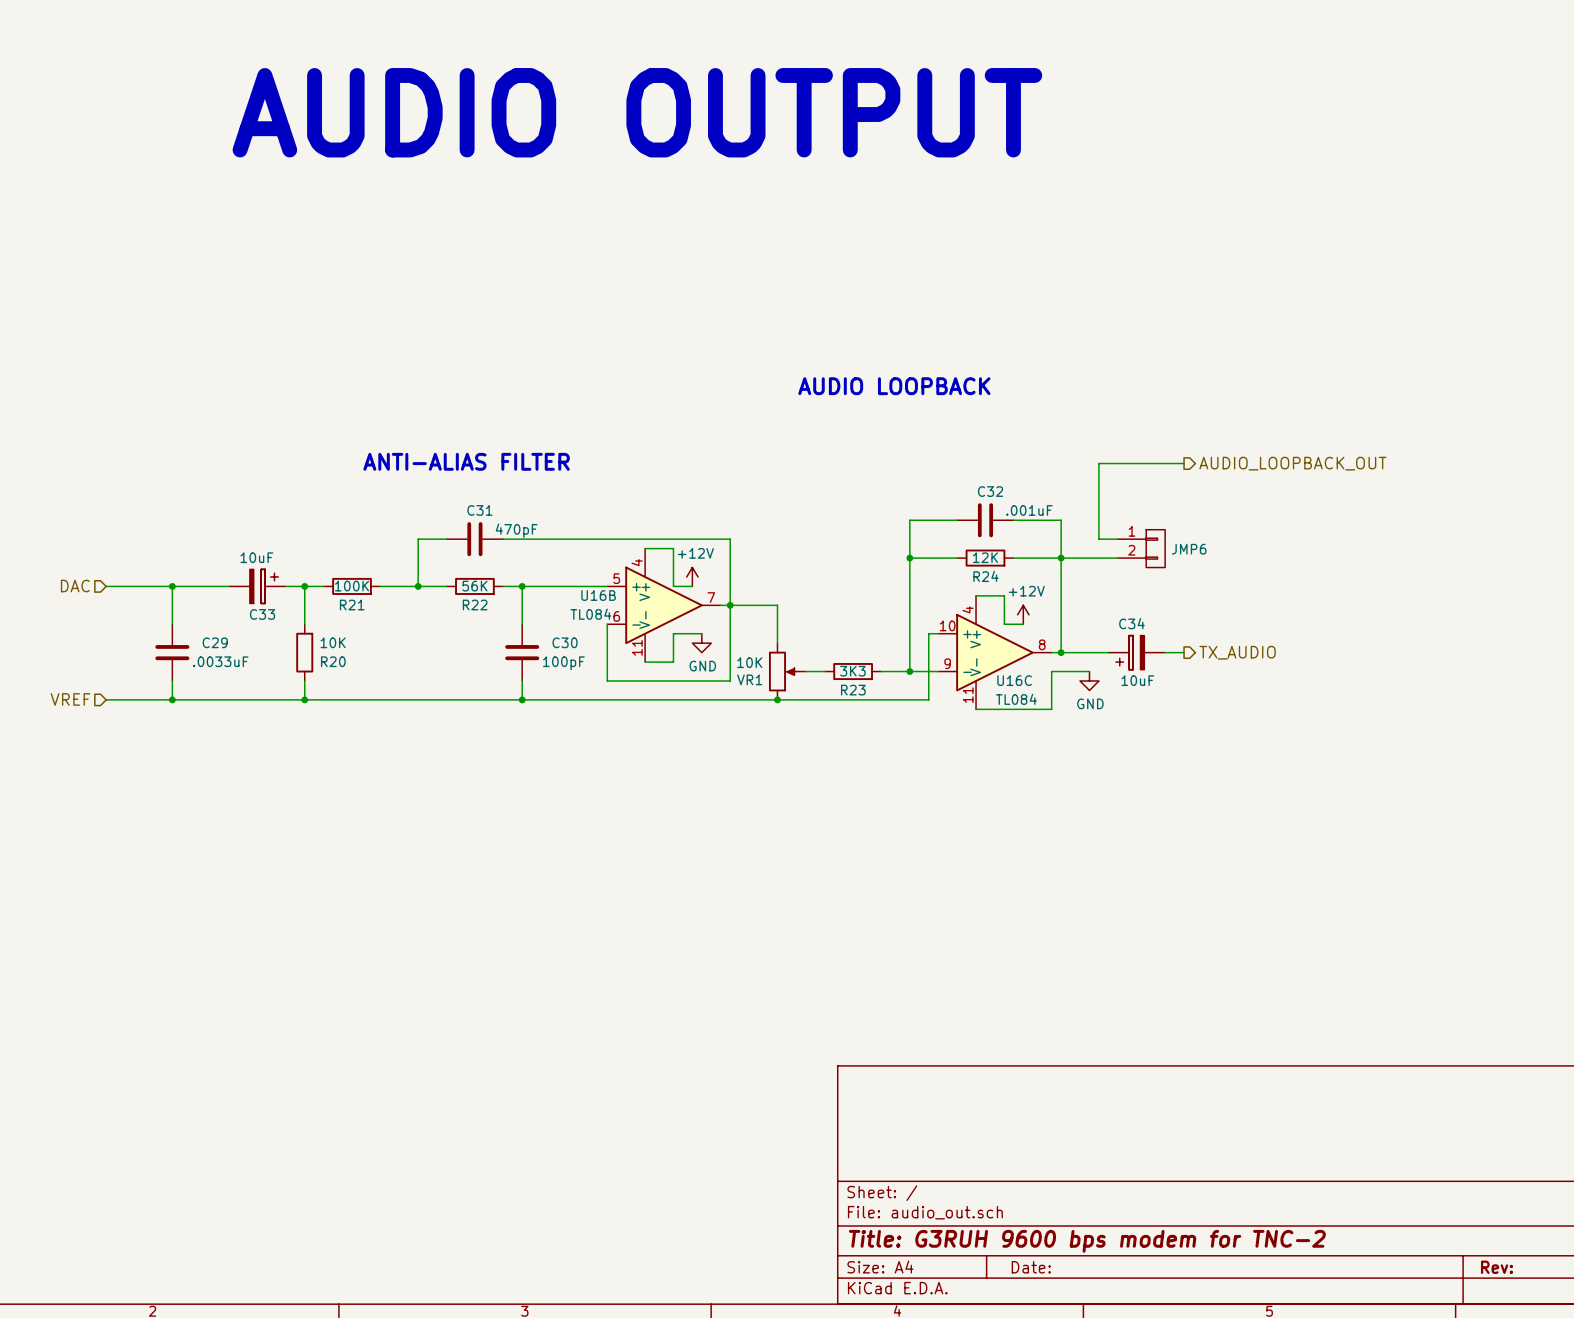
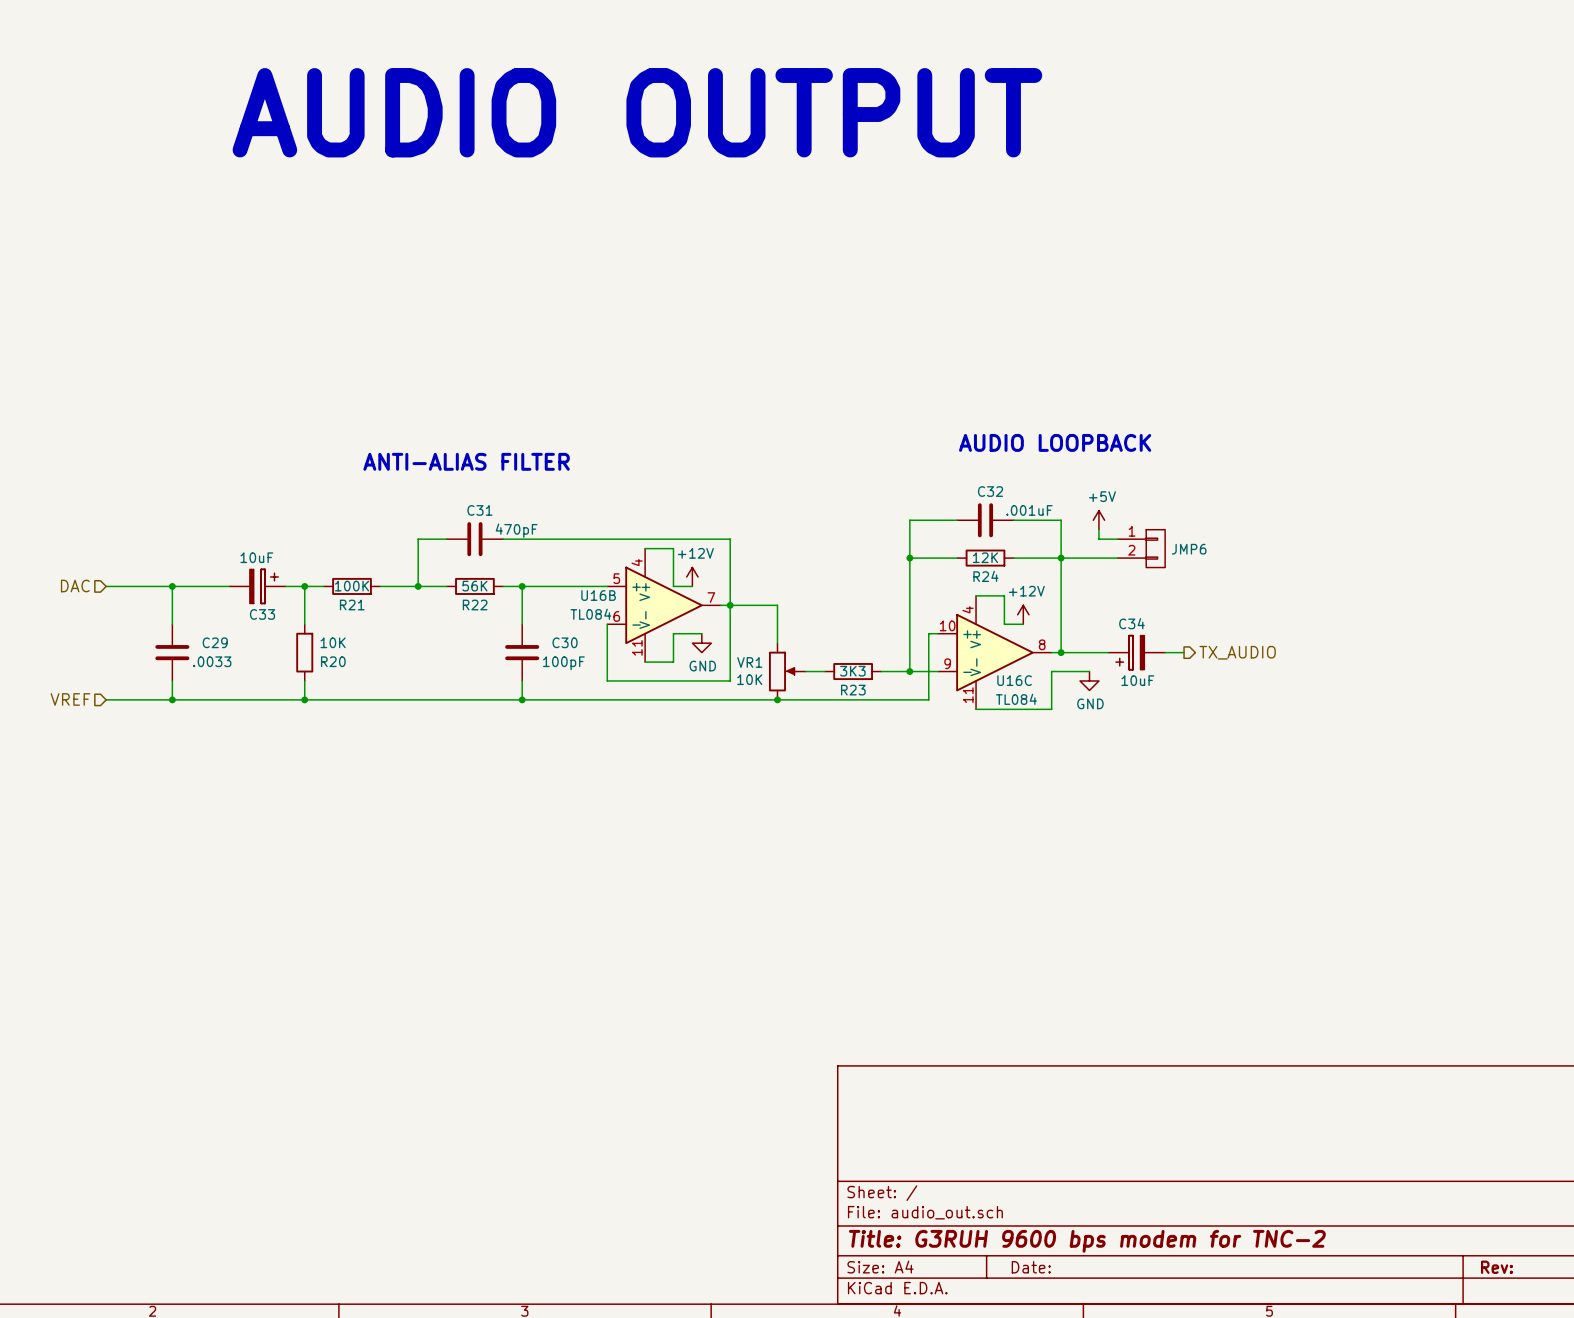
text position: AUDIO LOOPBACK (894, 386) -> AUDIO LOOPBACK (1055, 442)
wire: (1184, 463) (1098, 463) (1098, 529) -> none
hierarchical label: AUDIO_LOOPBACK_OUT (1292, 463) -> none
power symbol: none -> +5V (1098, 520)
C29 value: .0033uF (220, 661) -> .0033 (212, 661)
VR1 flip: as is (782, 671) -> up-down (782, 671)

